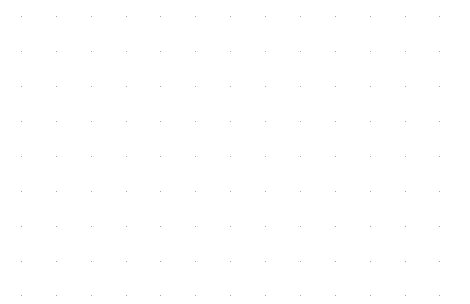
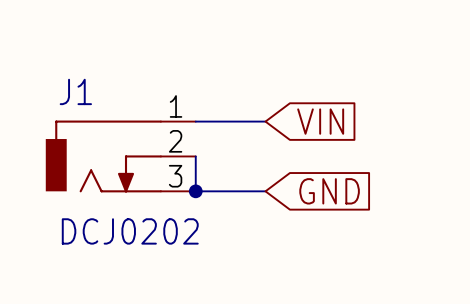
wire: none -> (195, 121) (265, 121)
global label: none -> VIN (320, 121)
J1: none -> DCJ0202 (120, 156)
wire: none -> (195, 156) (195, 191) (265, 191)
junction: none -> (195, 191)
global label: none -> GND (329, 191)

